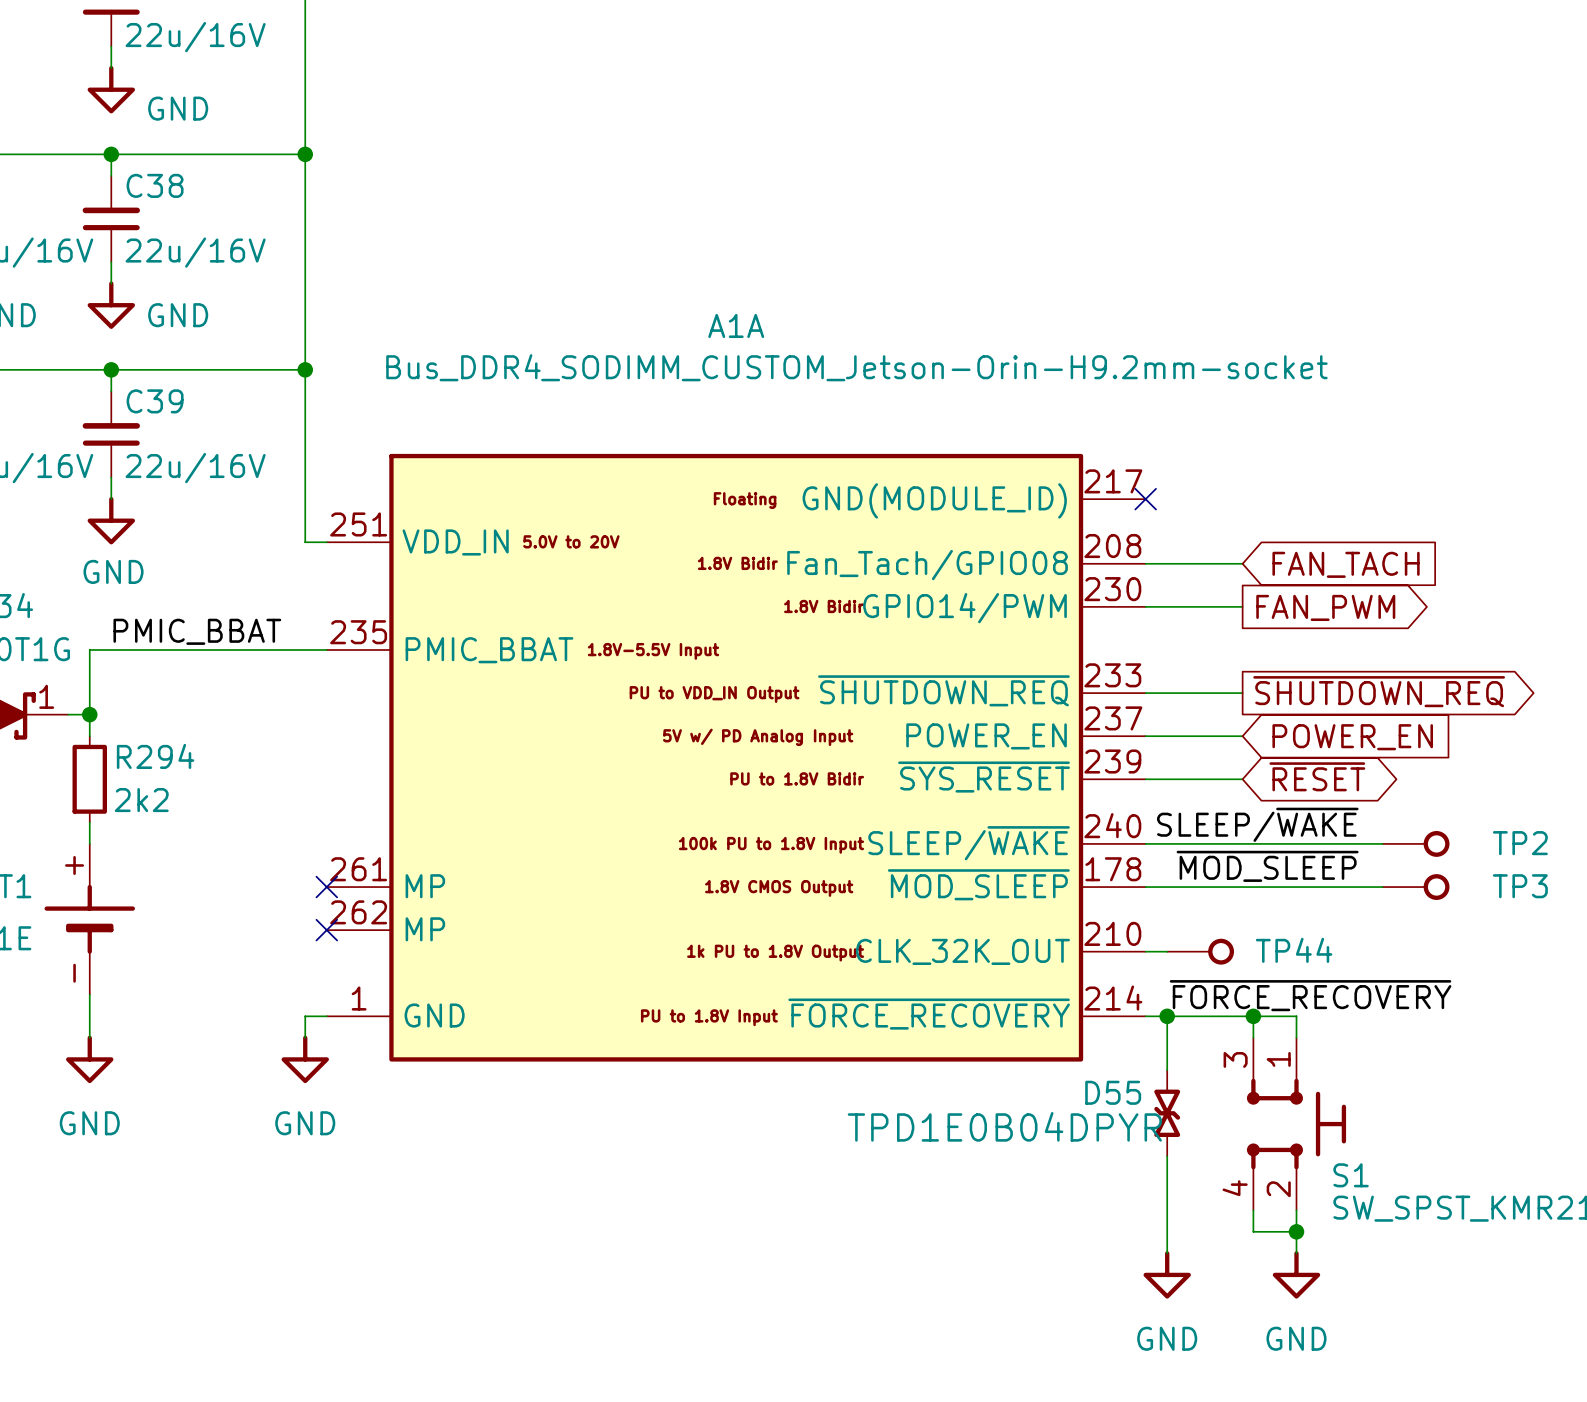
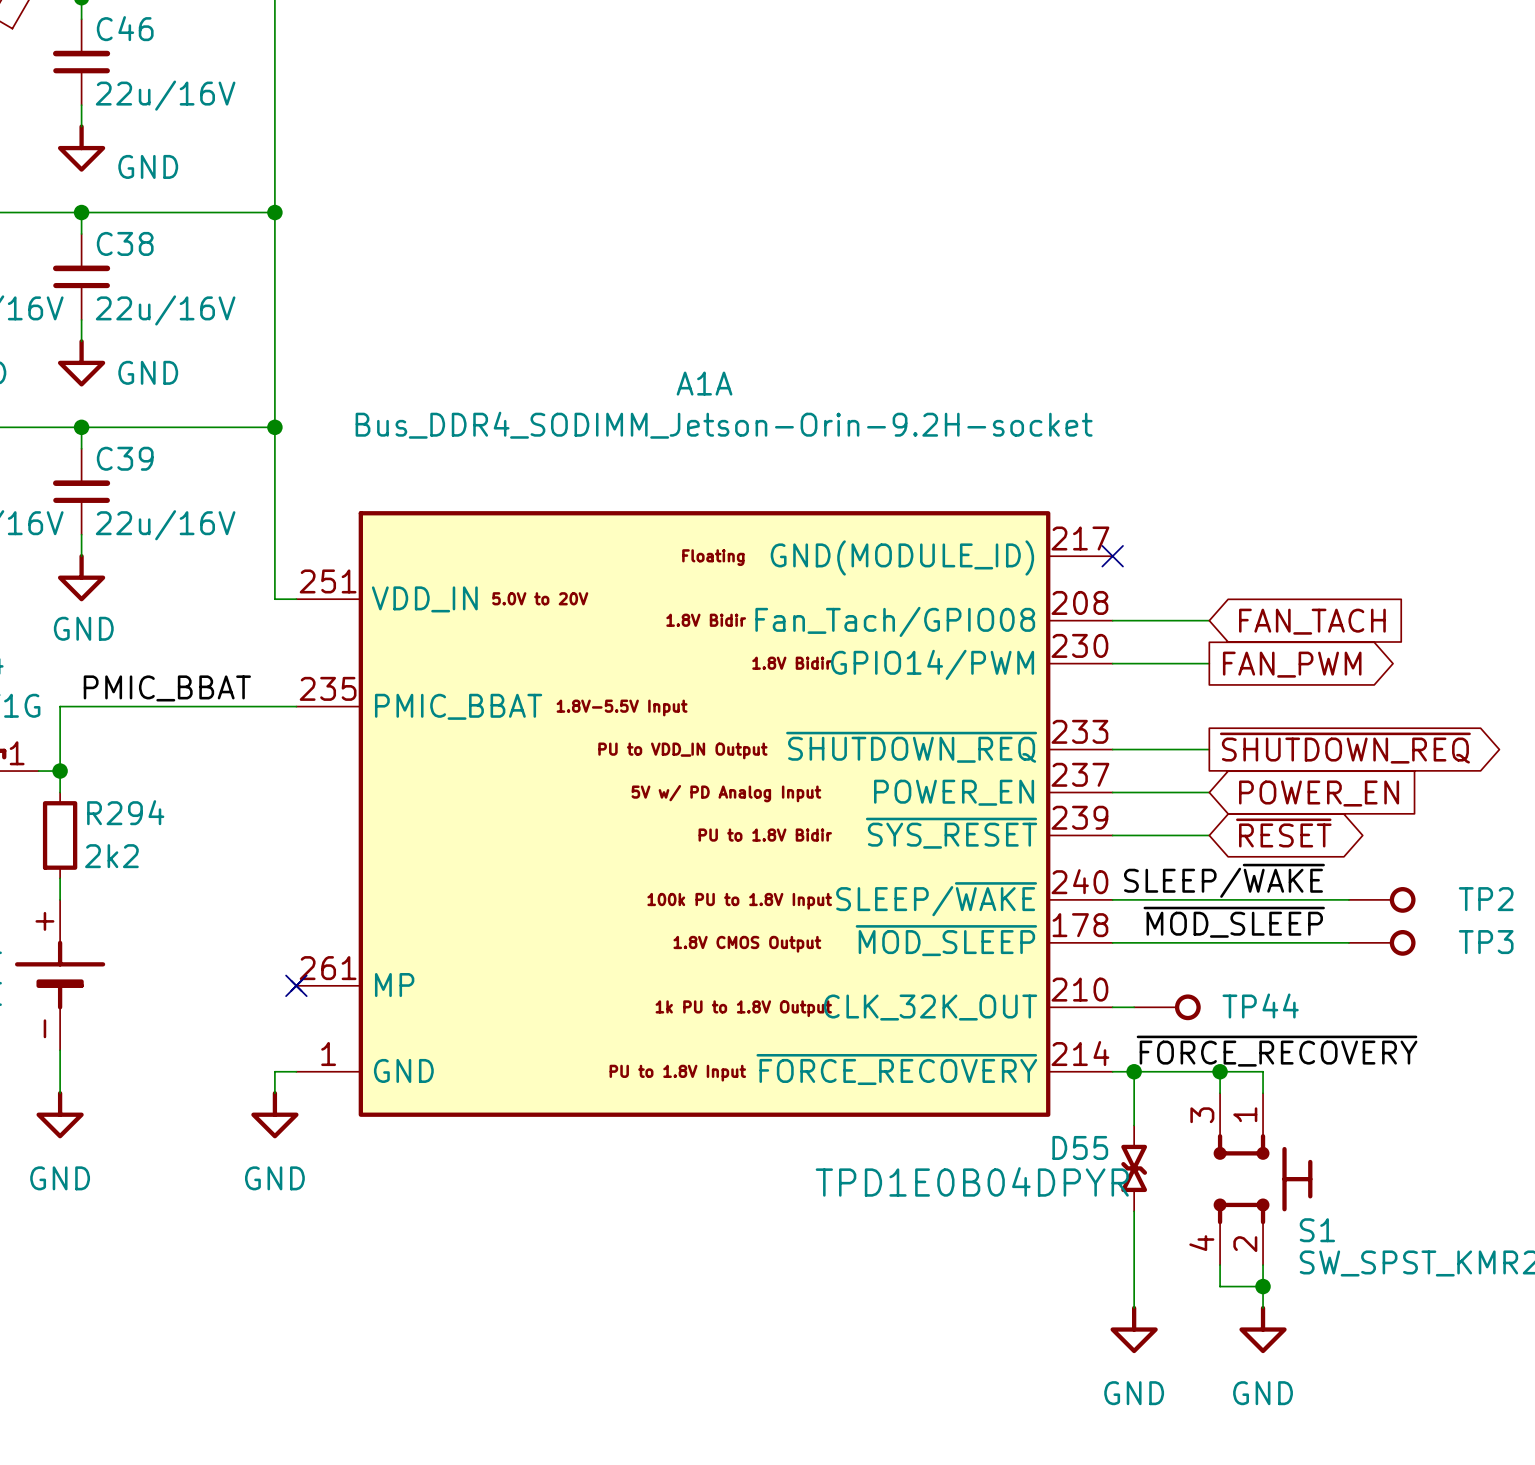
A1A value: Bus_DDR4_SODIMM_CUSTOM_Jetson-Orin-H9.2mm-socket (856, 367) -> Bus_DDR4_SODIMM_Jetson-Orin-9.2H-socket (724, 425)
A1A symbol: [326, 453, 1146, 1062] -> [291, 511, 1113, 1117]
no-connect mark: (326, 887) -> none

